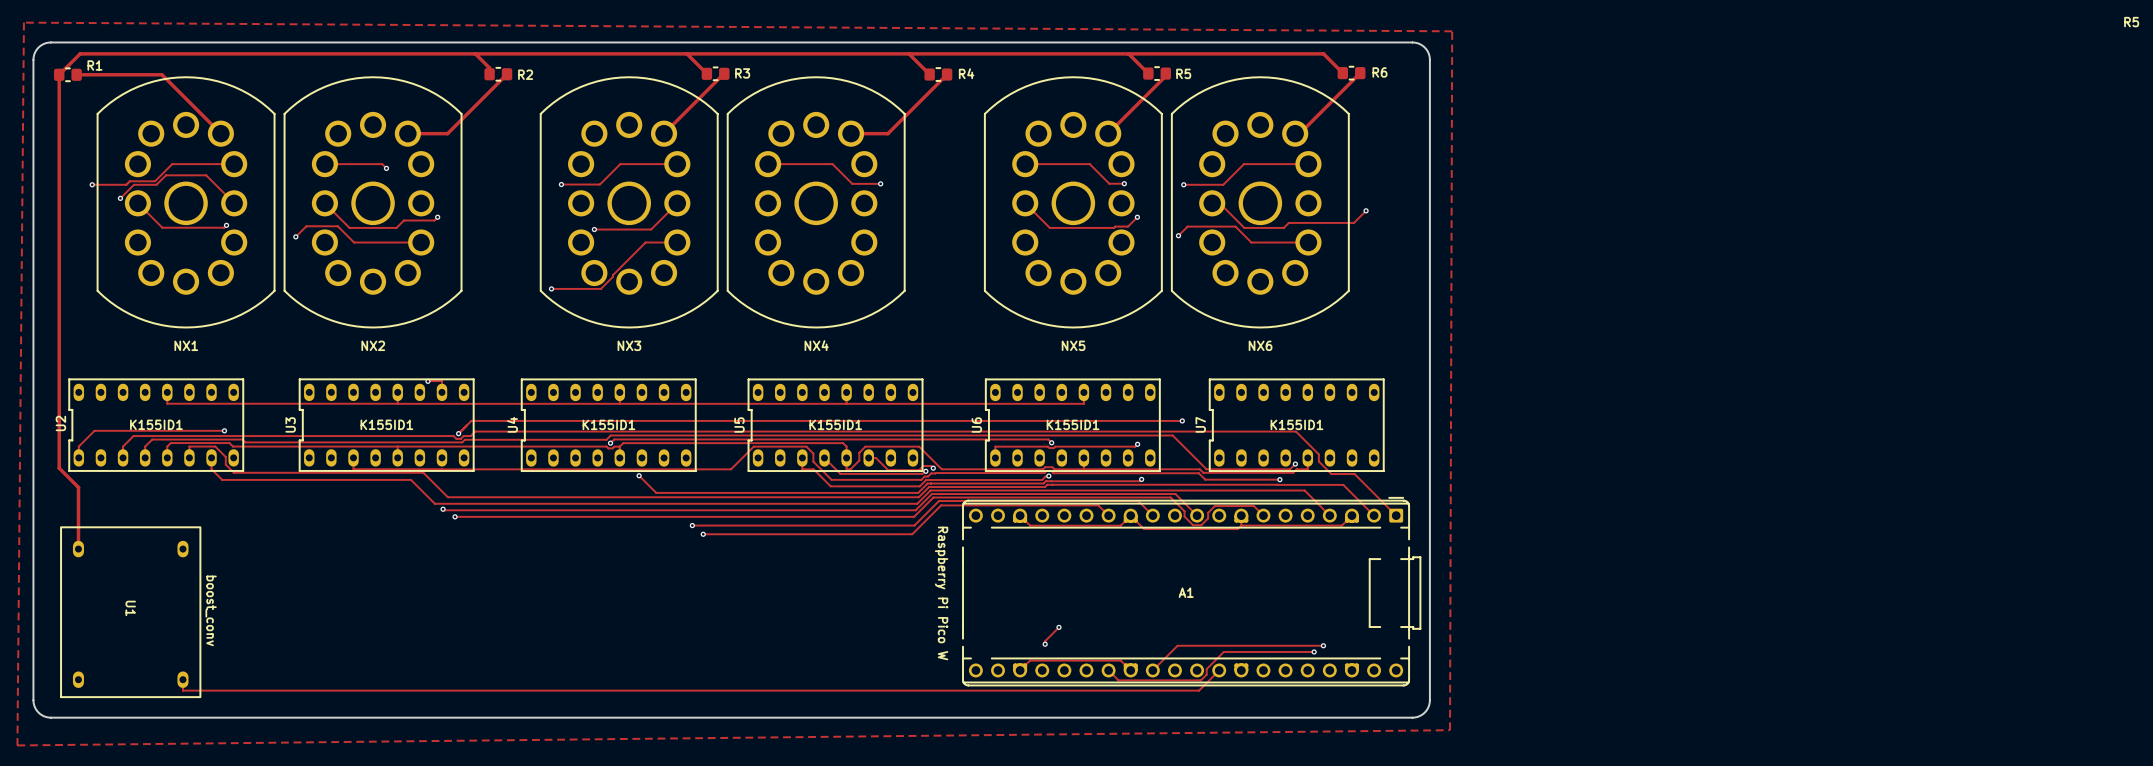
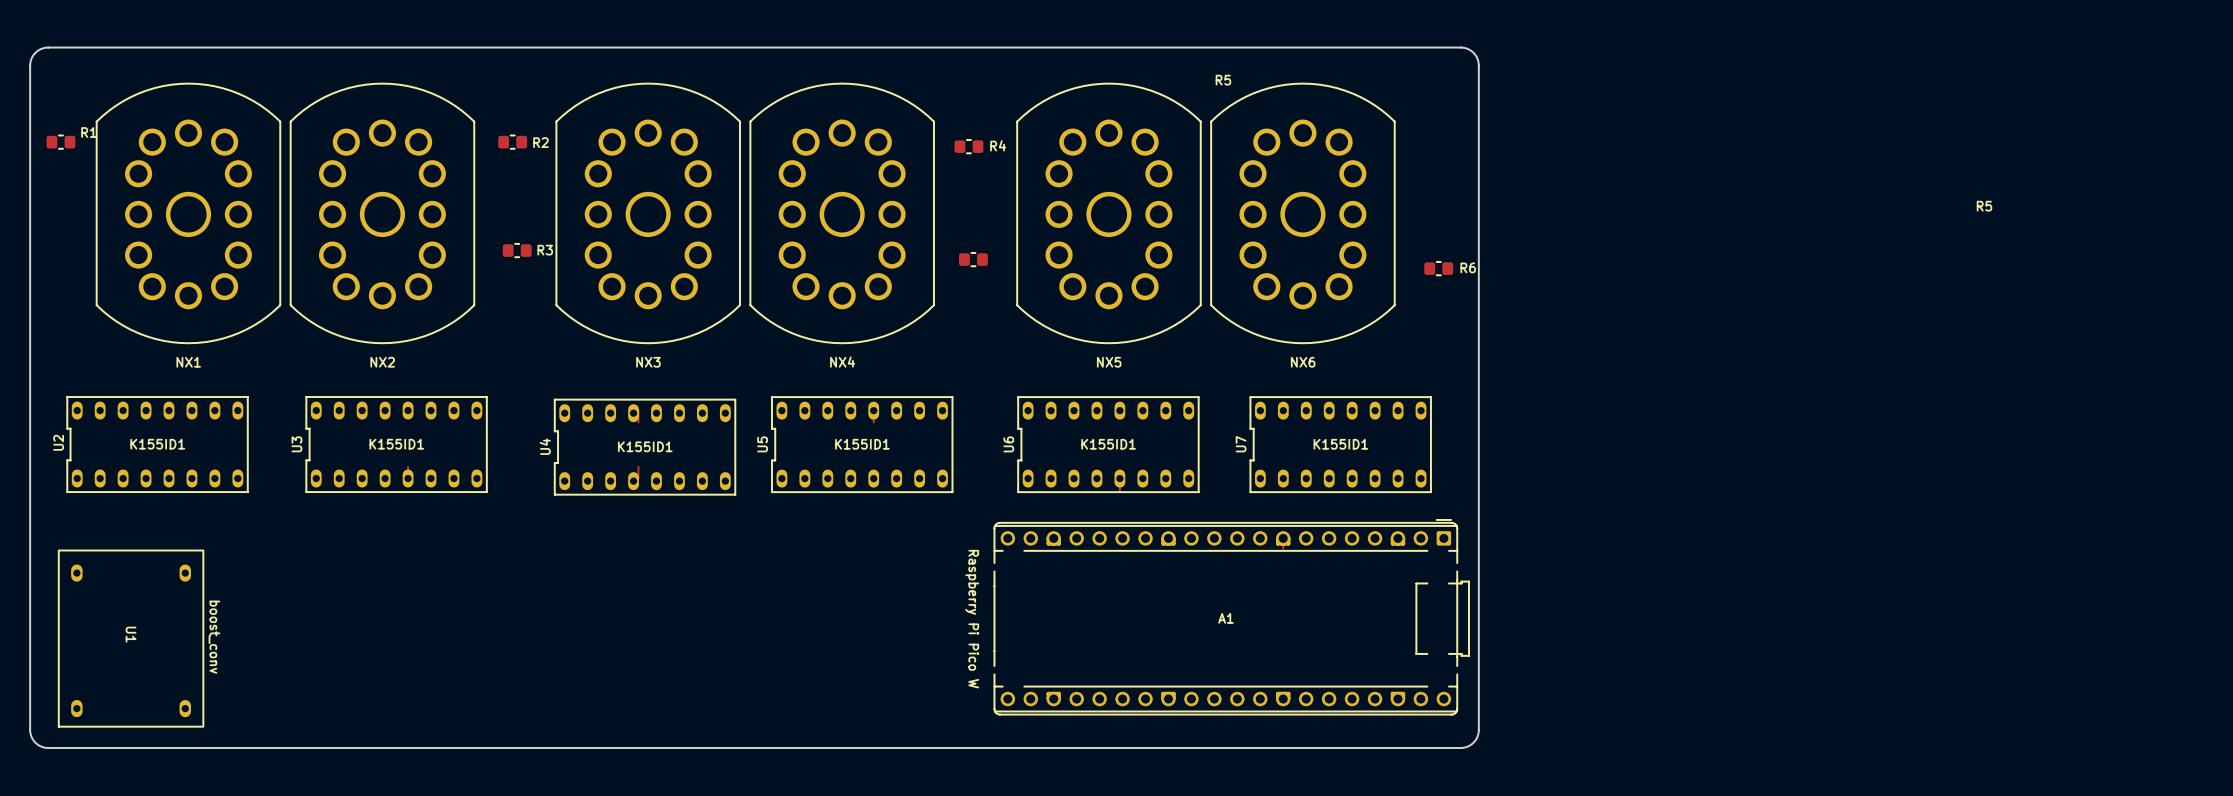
zone outline: (23, 22) (17, 745) (1450, 730) (1452, 31) (23, 22) -> none
track: (475, 53) (489, 68) (489, 74) -> none
track: (686, 53) (706, 73) -> none
track: (909, 53) (929, 74) -> none
track: (1128, 53) (1148, 73) -> none
R3 position: (715, 73) -> (517, 250)
track: (724, 73) (664, 133) -> none
R5 position: (1157, 73) -> (973, 259)
track: (1165, 73) (1165, 76) (1108, 133) -> none
track: (1342, 73) (1323, 53) (80, 53) (59, 74) (59, 468) (78, 487) -> none
R6 position: (1351, 73) -> (1438, 268)
track: (1360, 73) (1299, 133) (1295, 133) -> none
R1 position: (67, 74) -> (60, 142)
track: (76, 74) (162, 74) (220, 133) -> none
R2 position: (498, 74) -> (512, 142)
track: (507, 74) (447, 133) (407, 133) -> none
R4 position: (938, 74) -> (968, 146)
track: (947, 74) (887, 133) (851, 133) -> none
track: (234, 164) (172, 164) (155, 181) (129, 181) (126, 184) (92, 184) -> none
track: (324, 164) (382, 164) (386, 168) -> none
track: (677, 164) (620, 164) (599, 184) (561, 184) -> none
track: (768, 164) (832, 164) (852, 183) (880, 183) -> none
track: (1025, 164) (1089, 164) (1109, 183) (1124, 183) -> none
track: (1308, 164) (1243, 164) (1223, 184) (1183, 184) -> none
via: (386, 168) -> none
via: (880, 183) -> none
via: (1124, 183) -> none
via: (92, 184) -> none
via: (561, 184) -> none
via: (1183, 184) -> none
track: (120, 198) (134, 184) (156, 184) (165, 175) (206, 175) (234, 203) -> none
via: (120, 198) -> none
track: (137, 203) (162, 227) (224, 227) (226, 225) -> none
track: (324, 203) (349, 227) (396, 227) (403, 220) (434, 220) (437, 217) -> none
track: (677, 203) (651, 229) (594, 229) -> none
track: (1025, 203) (1049, 227) (1128, 226) (1137, 217) -> none
track: (1212, 203) (1219, 203) (1244, 227) (1283, 227) (1288, 222) (1353, 222) (1366, 210) -> none
via: (1366, 210) -> none
via: (437, 217) -> none
via: (1137, 217) -> none
via: (226, 225) -> none
via: (594, 229) -> none
track: (1178, 235) (1187, 226) (1235, 226) (1251, 242) (1308, 242) -> none
via: (1178, 235) -> none
track: (295, 236) (306, 226) (337, 226) (354, 242) (421, 242) -> none
via: (295, 236) -> none
track: (677, 242) (645, 242) (600, 288) (551, 288) -> none
via: (551, 288) -> none
track: (427, 381) (441, 381) (441, 392) -> none
via: (427, 381) -> none
track: (167, 392) (167, 403) (397, 403) (397, 392) -> none
track: (1083, 392) (1083, 403) (397, 403) -> none
track: (1182, 420) (471, 420) (458, 433) -> none
via: (1182, 420) -> none
U4 position: (608, 425) -> (645, 447)
track: (224, 430) (94, 430) (78, 446) (78, 457) -> none
via: (224, 430) -> none
via: (458, 433) -> none
track: (1051, 442) (1048, 439) (614, 439) (610, 443) -> none
via: (1051, 442) -> none
via: (610, 443) -> none
track: (1137, 444) (1135, 446) (1053, 448) (995, 446) (995, 457) -> none
via: (1137, 444) -> none
track: (123, 457) (123, 446) (133, 436) (453, 436) (456, 438) (460, 438) (463, 436) (470, 436) (475, 431) (1296, 431) (1318, 454) (1318, 461) (1331, 474) (1354, 474) (1396, 515) -> none
track: (145, 457) (145, 446) (152, 439) (242, 439) (245, 442) (462, 442) (464, 439) (606, 439) (610, 435) (1172, 435) (1206, 469) (1290, 469) (1295, 464) -> none
track: (167, 457) (167, 446) (170, 443) (229, 443) (233, 446) (606, 446) (608, 448) (619, 446) (623, 443) (843, 443) (846, 446) (846, 469) (850, 469) (859, 460) (859, 452) (865, 446) (919, 446) (941, 469) (1043, 469) (1045, 467) (1052, 467) (1054, 469) (1199, 469) (1203, 472) (1293, 472) (1296, 469) (1307, 469) (1307, 457) -> none
track: (189, 457) (189, 446) (215, 446) (225, 457) (225, 464) (233, 472) (423, 472) (447, 497) (918, 497) (929, 487) (1045, 487) (1047, 484) (1343, 484) (1374, 515) -> none
track: (211, 457) (211, 469) (222, 479) (411, 479) (434, 503) (917, 503) (930, 490) (1304, 490) (1329, 515) -> none
track: (353, 457) (353, 469) (731, 469) (753, 446) (806, 446) (813, 453) (813, 461) (831, 479) (921, 479) (931, 473) (935, 473) (1044, 473) (1046, 470) (1053, 473) (1198, 473) (1205, 479) (1279, 479) -> none
track: (802, 457) (802, 469) (813, 469) (830, 486) (919, 486) (926, 480) (1042, 480) (1048, 476) -> none
track: (824, 457) (840, 473) (922, 473) (925, 471) -> none
track: (868, 457) (875, 457) (888, 470) (919, 470) (923, 466) (931, 466) (933, 468) -> none
via: (1295, 464) -> none
via: (933, 468) -> none
via: (925, 471) -> none
track: (639, 475) (656, 492) (918, 492) (927, 483) (1043, 483) (1046, 480) (1139, 481) (1141, 479) -> none
via: (639, 475) -> none
via: (1048, 476) -> none
via: (1141, 479) -> none
via: (1279, 479) -> none
track: (78, 487) (78, 549) -> none
track: (1237, 505) (1245, 505) -> none
track: (1237, 506) (1214, 506) (1208, 512) (1208, 518) (1201, 525) (1193, 525) (1184, 516) (1184, 511) (1170, 497) (933, 497) (914, 516) (455, 516) -> none
track: (1245, 506) (1253, 506) (1263, 515) -> none
track: (443, 509) (915, 510) (931, 494) (1175, 494) (1197, 515) -> none
via: (443, 509) -> none
track: (1020, 515) (1030, 525) (1120, 525) (1130, 515) (1144, 529) (1237, 529) (1241, 525) (1342, 525) (1351, 515) -> none
track: (1108, 515) (1098, 505) (941, 505) (912, 534) (703, 534) -> none
track: (1152, 515) (1138, 501) (938, 501) (914, 525) (692, 525) -> none
via: (455, 516) -> none
via: (692, 525) -> none
via: (703, 534) -> none
track: (1058, 627) (1045, 641) (1045, 644) -> none
via: (1058, 627) -> none
via: (1045, 644) -> none
track: (1323, 645) (1177, 645) (1152, 670) -> none
via: (1323, 645) -> none
track: (1314, 651) (1223, 651) (1206, 669) (1206, 674) (1200, 680) (1118, 680) (1108, 670) -> none
via: (1314, 651) -> none
track: (1020, 670) (1029, 660) (1120, 660) (1130, 670) -> none
track: (1219, 670) (1199, 690) (182, 690) (182, 679) -> none

